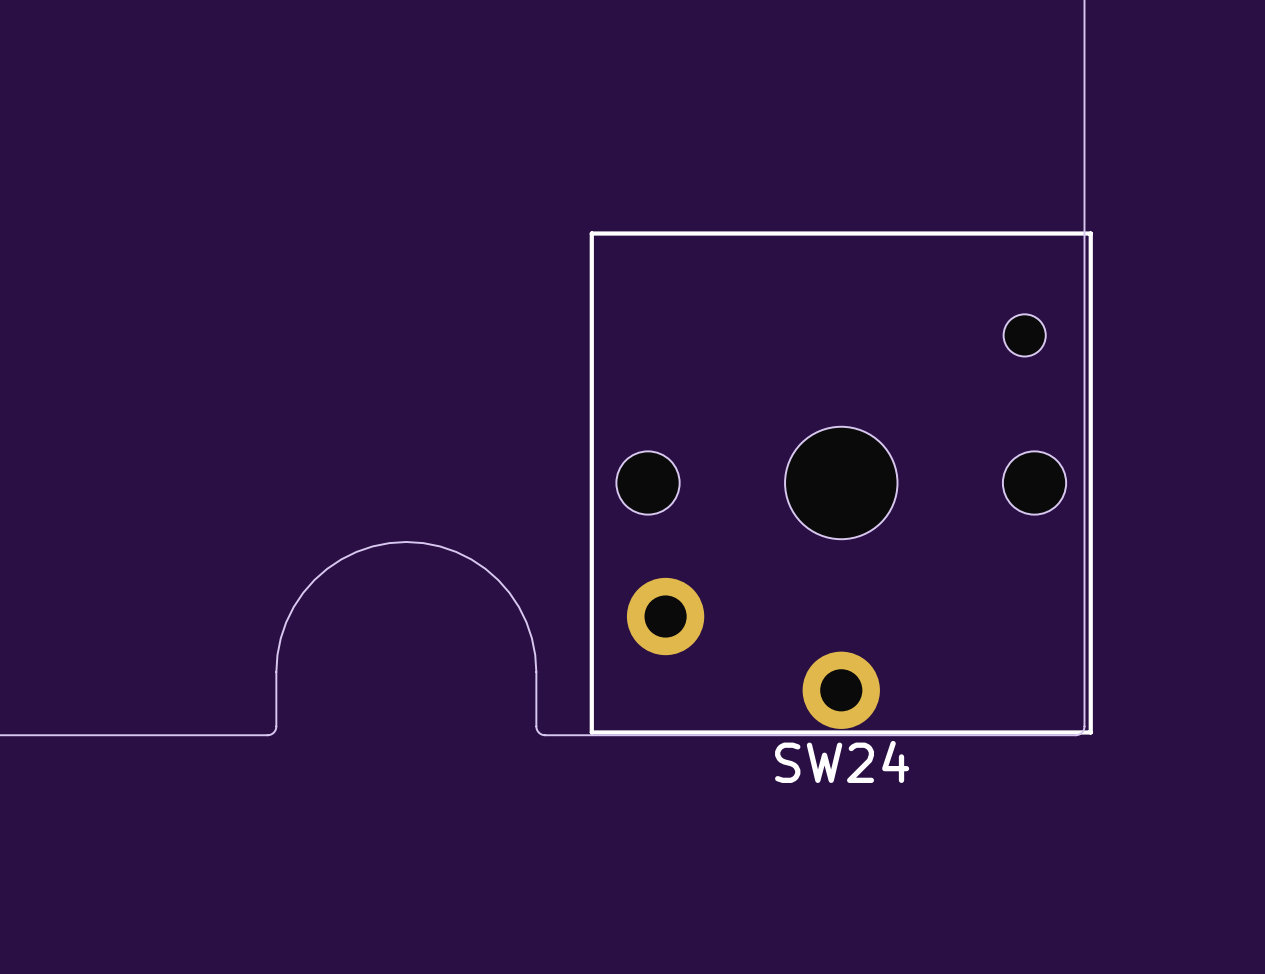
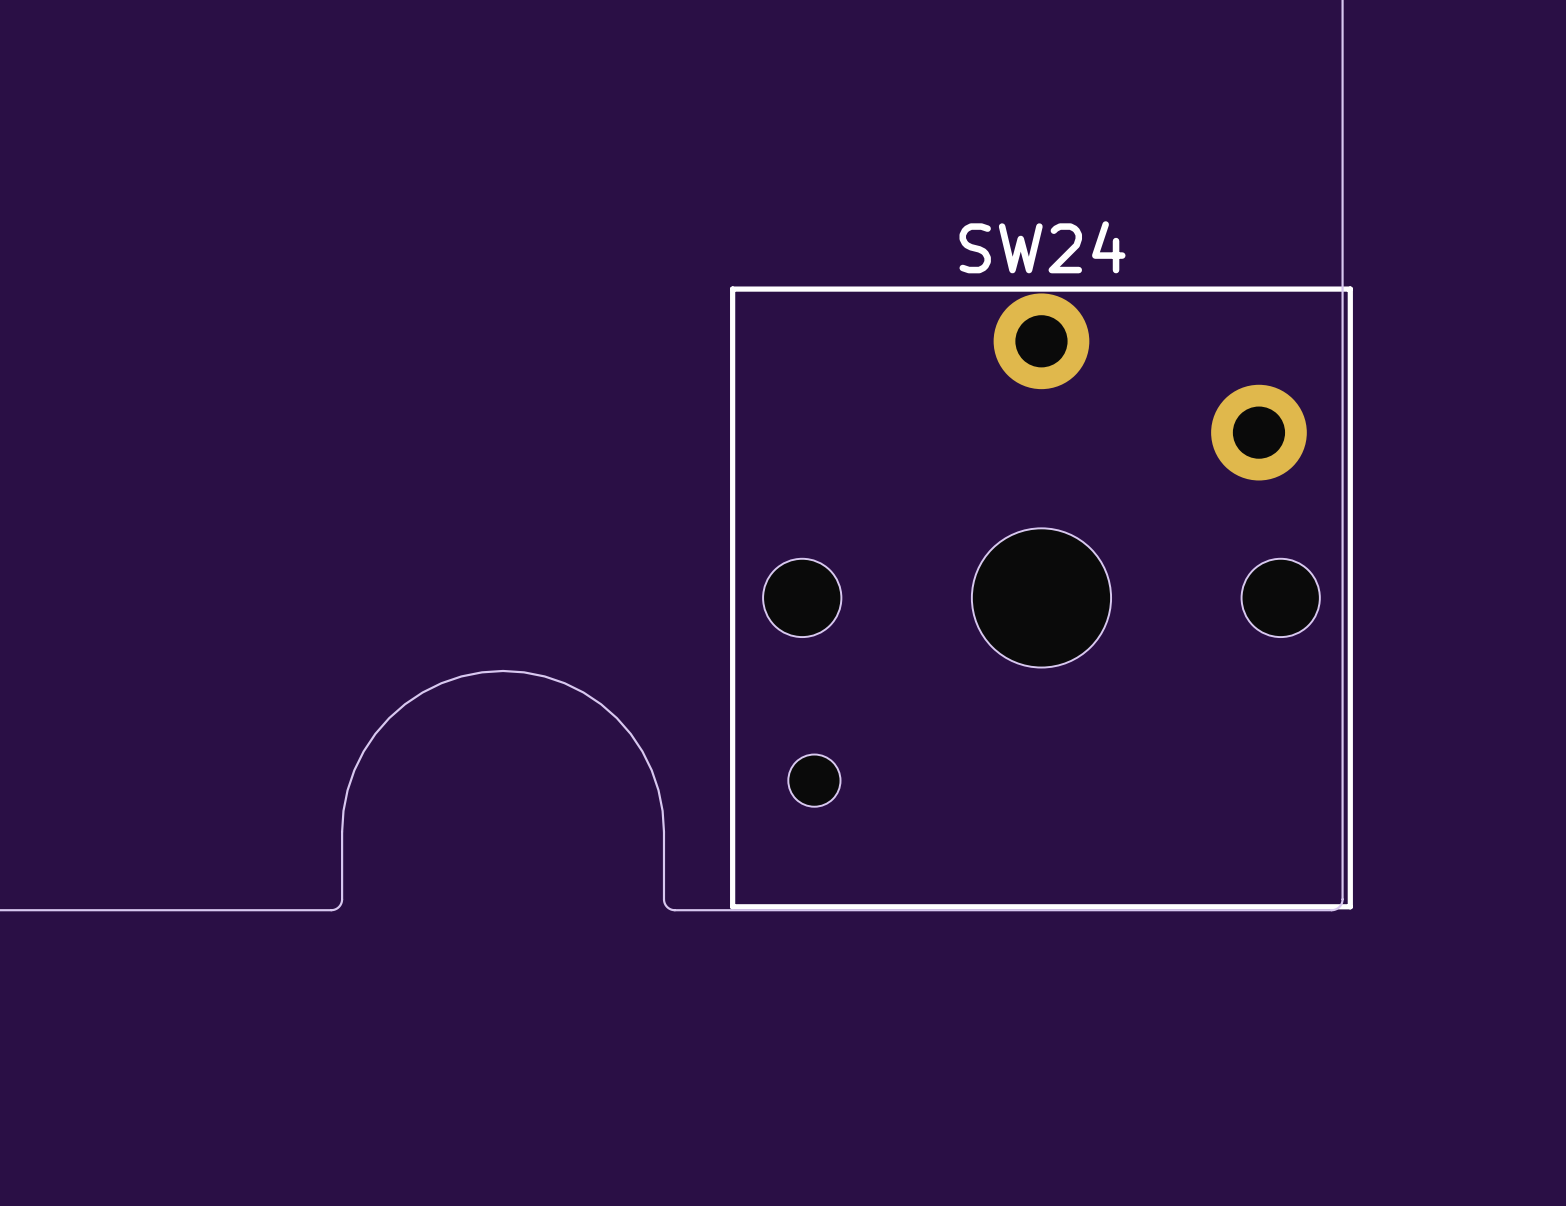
SW24 rotation: 0° (841, 482) -> 180° (1041, 597)

